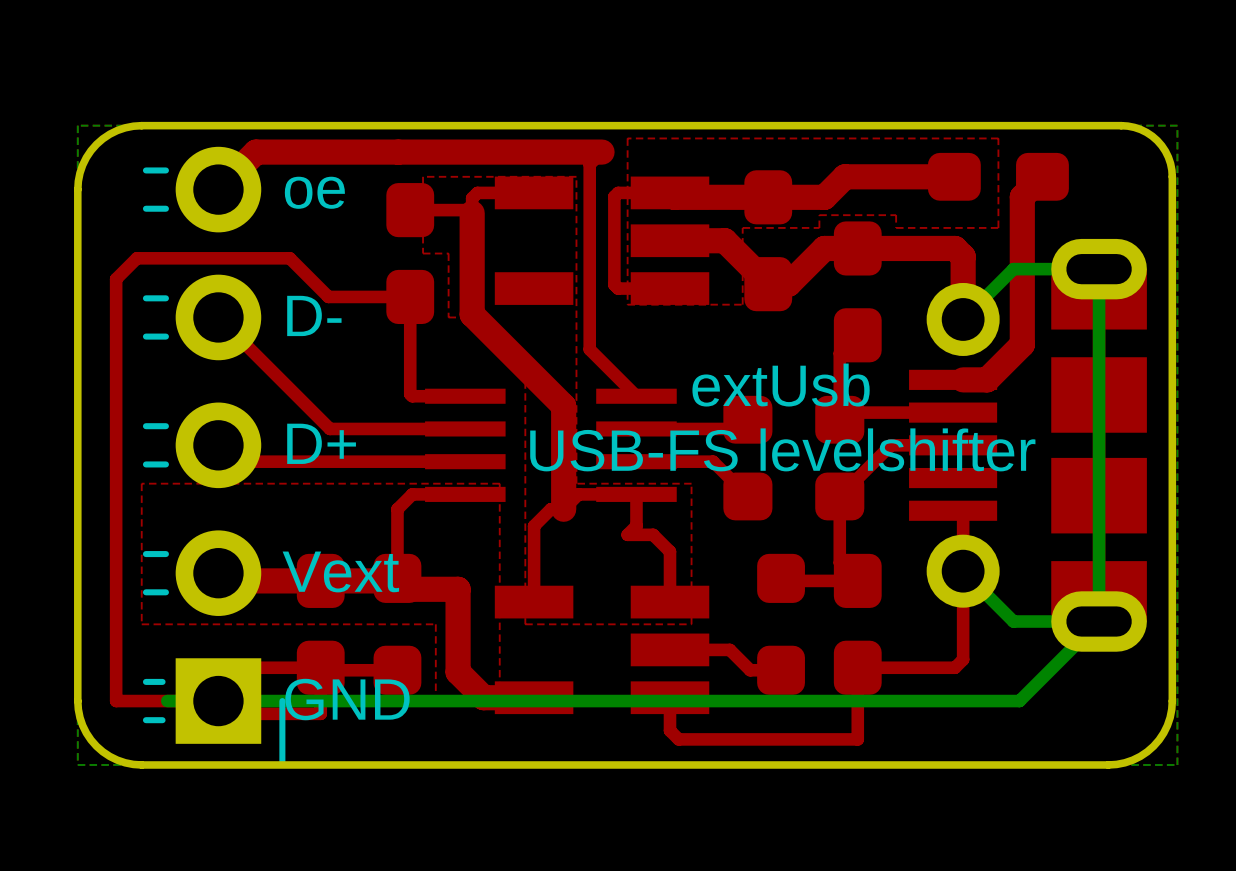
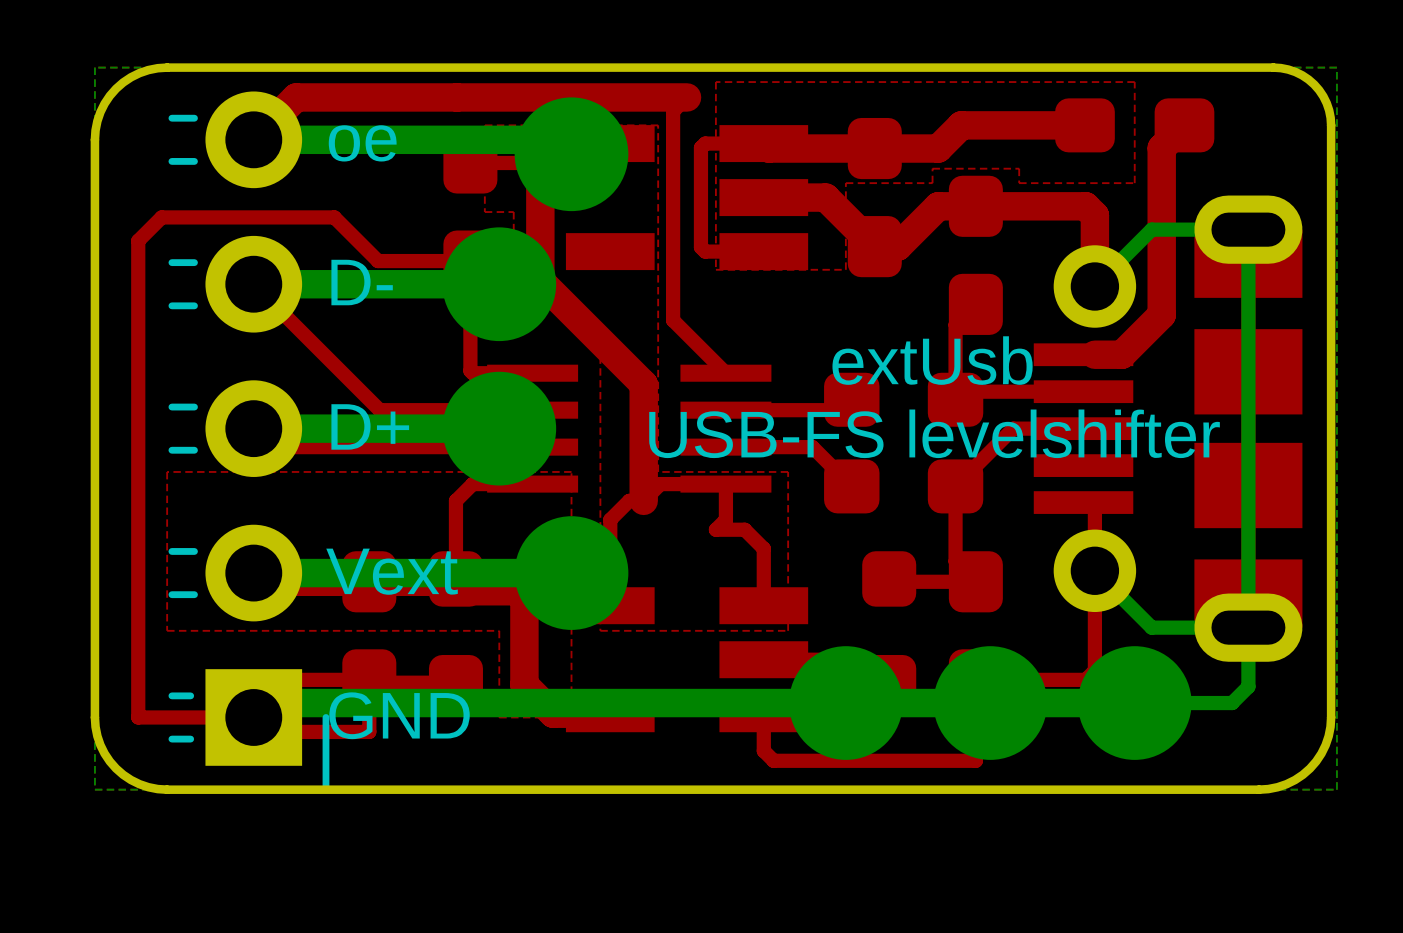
bottom track: none -> (253, 139) (557, 139) (571, 154)
part: none -> (571, 154)
bottom track: none -> (499, 284) (253, 284)
part: none -> (499, 284)
text position: extUsb (781, 385) -> extUsb (932, 360)
bottom track: none -> (499, 428) (253, 428)
part: none -> (499, 428)
text position: USB-FS levelshifter (782, 449) -> USB-FS levelshifter (934, 433)
bottom track: none -> (571, 573) (253, 573)
part: none -> (571, 573)
bottom track: (1099, 621) (1019, 701) (167, 701) -> (1248, 627) (1248, 686) (1232, 703) (268, 703) (253, 717)
part: none -> (845, 703)
part: none -> (990, 703)
part: none -> (1134, 703)

